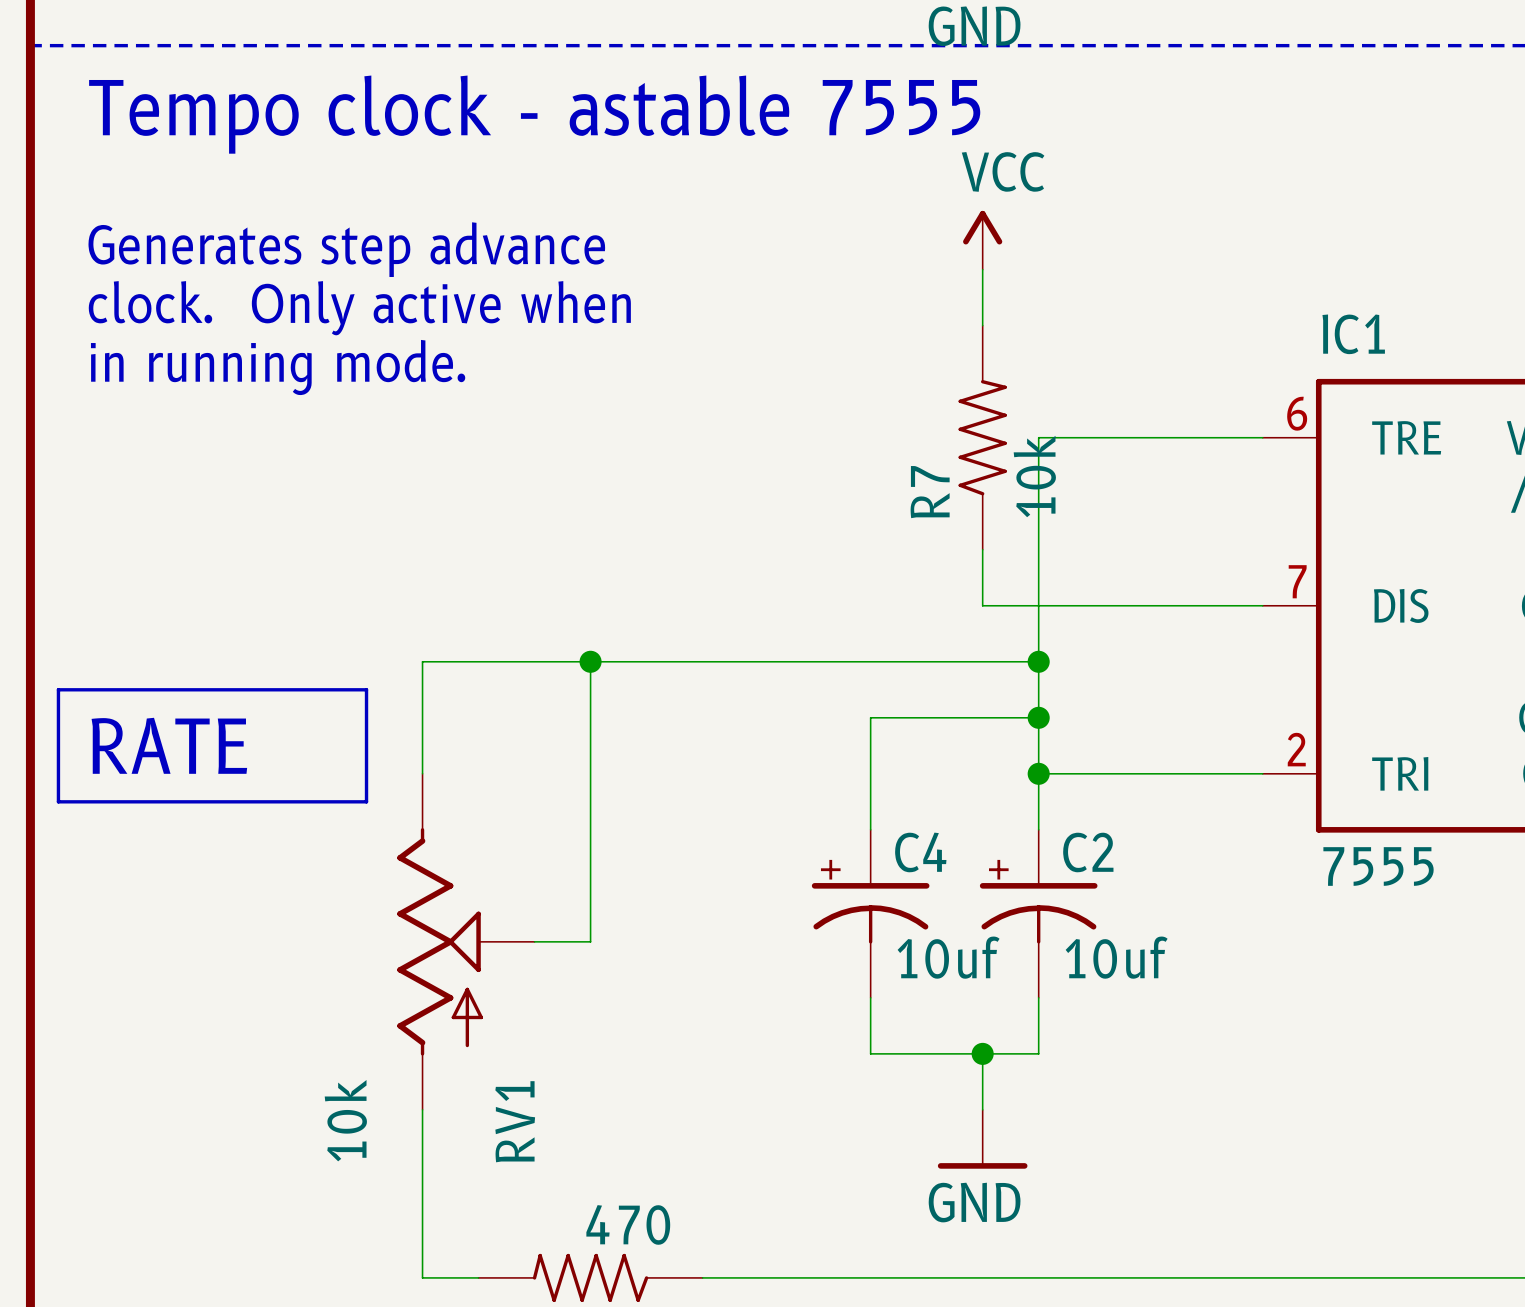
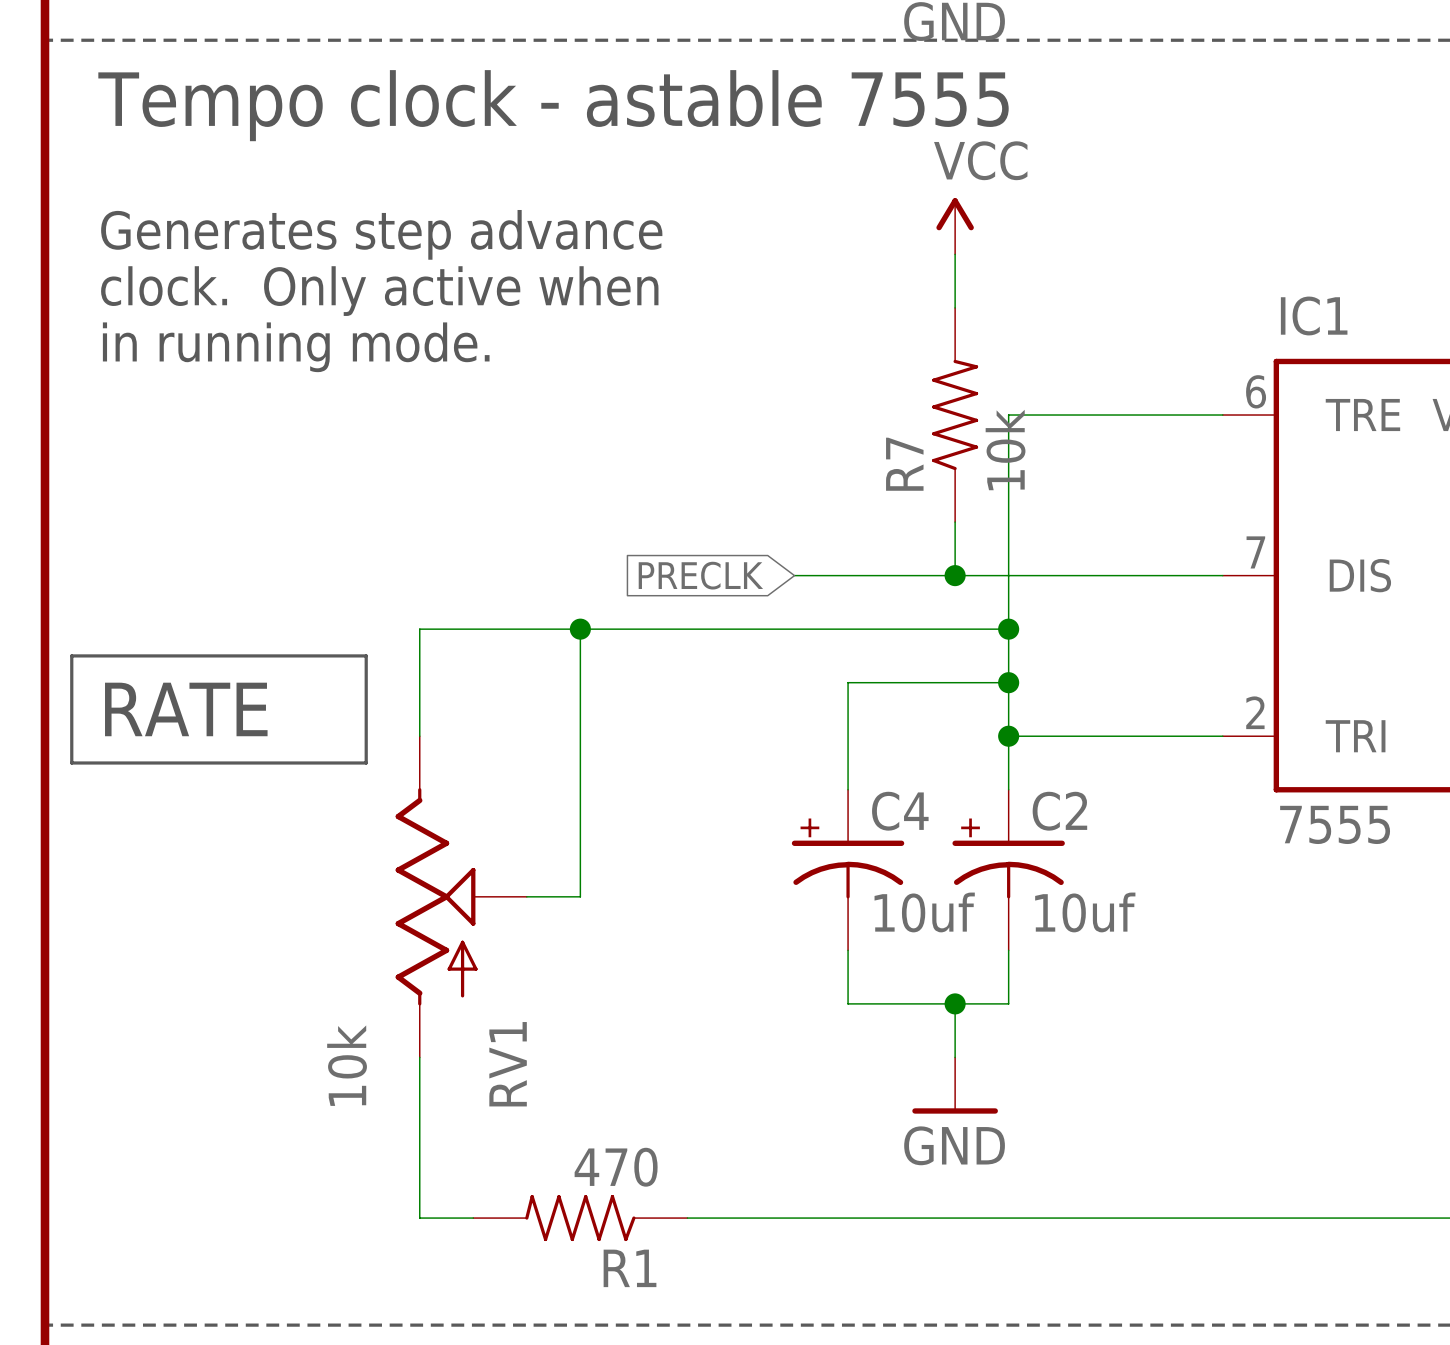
global label: none -> PRECLK (700, 575)
wire: none -> (794, 575) (955, 575)
junction: none -> (955, 575)

